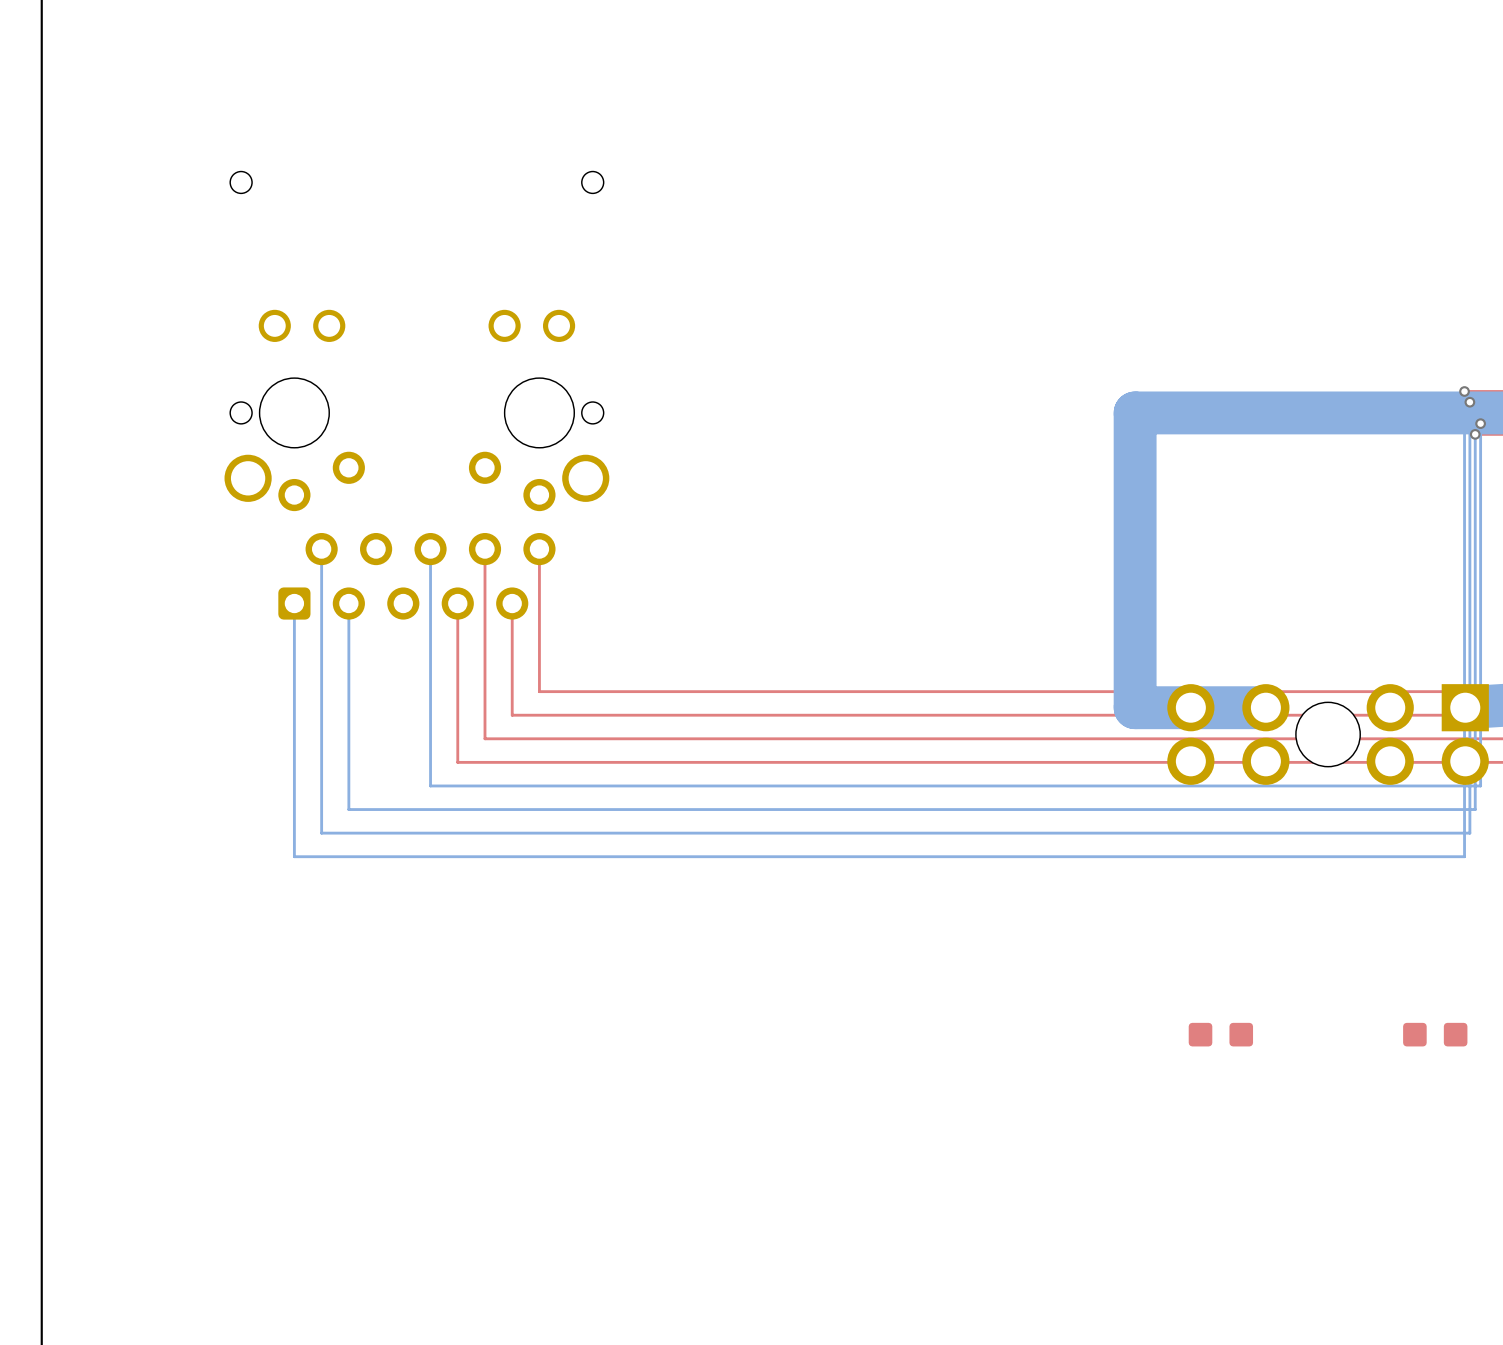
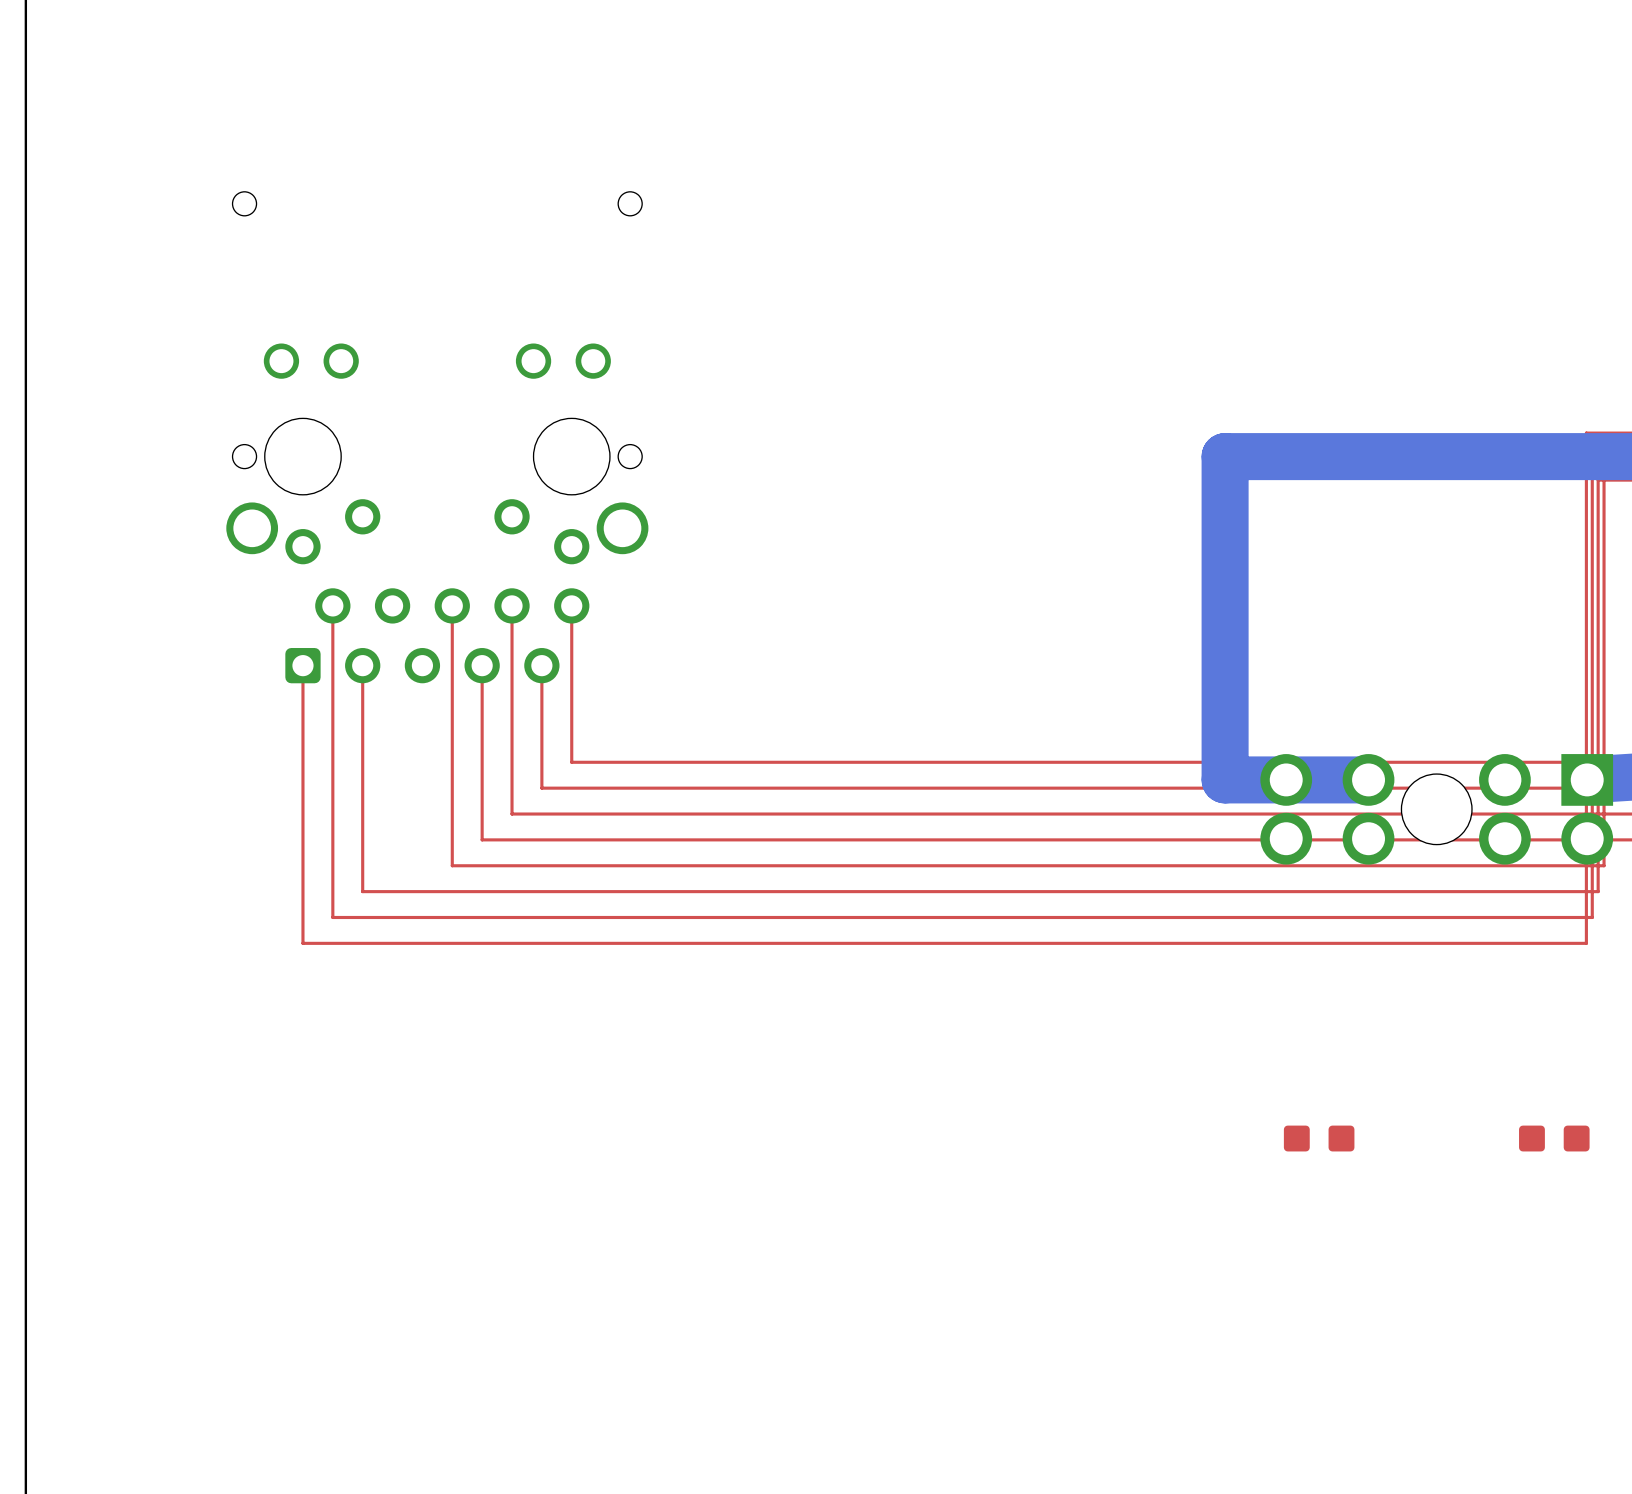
top track: none -> (1586, 433) (1586, 943) (302, 943) (302, 665)
bottom track: (1464, 391) (1464, 856) (294, 856) (294, 603) -> none
via: (1464, 391) -> none
top track: none -> (1592, 444) (1592, 917) (332, 917) (332, 605)
bottom track: (1469, 402) (1469, 833) (321, 833) (321, 549) -> none
via: (1469, 402) -> none
top track: none -> (1604, 468) (1604, 865) (452, 865) (452, 605)
bottom track: (1480, 423) (1480, 785) (430, 785) (430, 549) -> none
via: (1480, 423) -> none
top track: none -> (1598, 480) (1598, 891) (362, 891) (362, 665)
bottom track: (1475, 434) (1475, 809) (348, 809) (348, 603) -> none
via: (1475, 434) -> none

